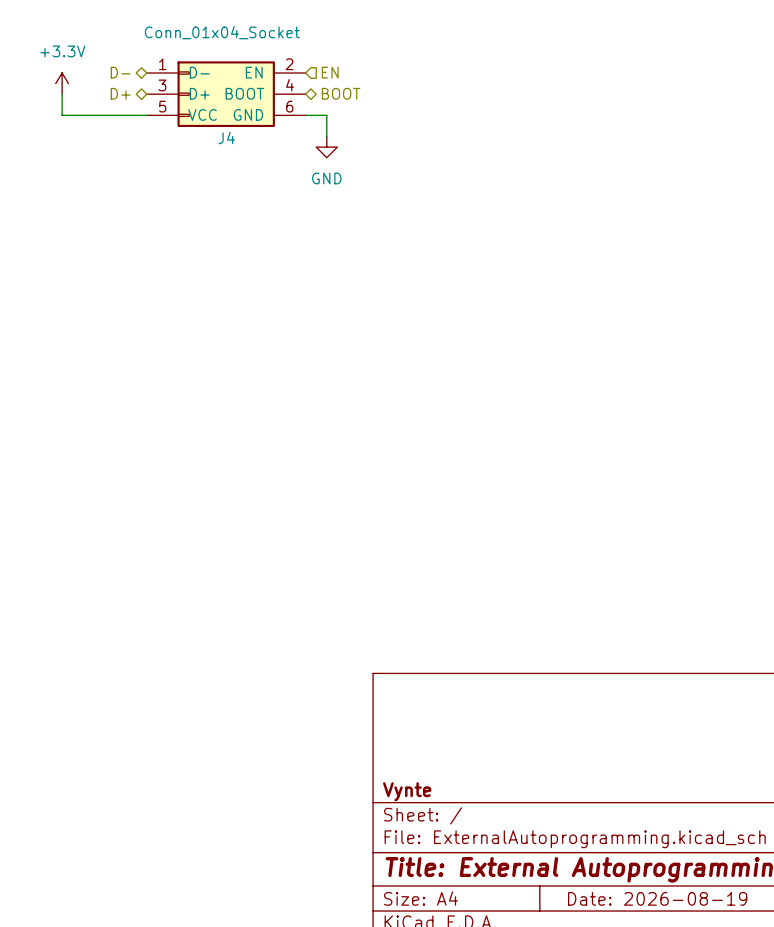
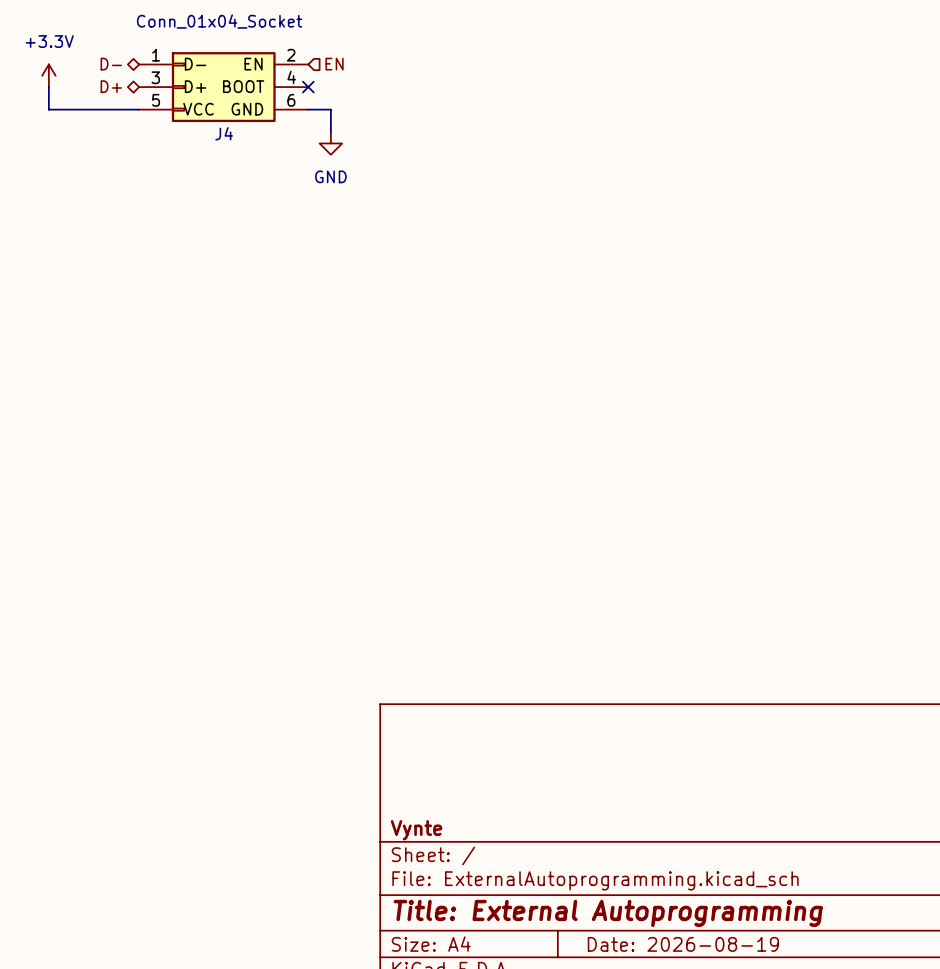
hierarchical label: BOOT (341, 93) -> none
no-connect mark: none -> (308, 87)

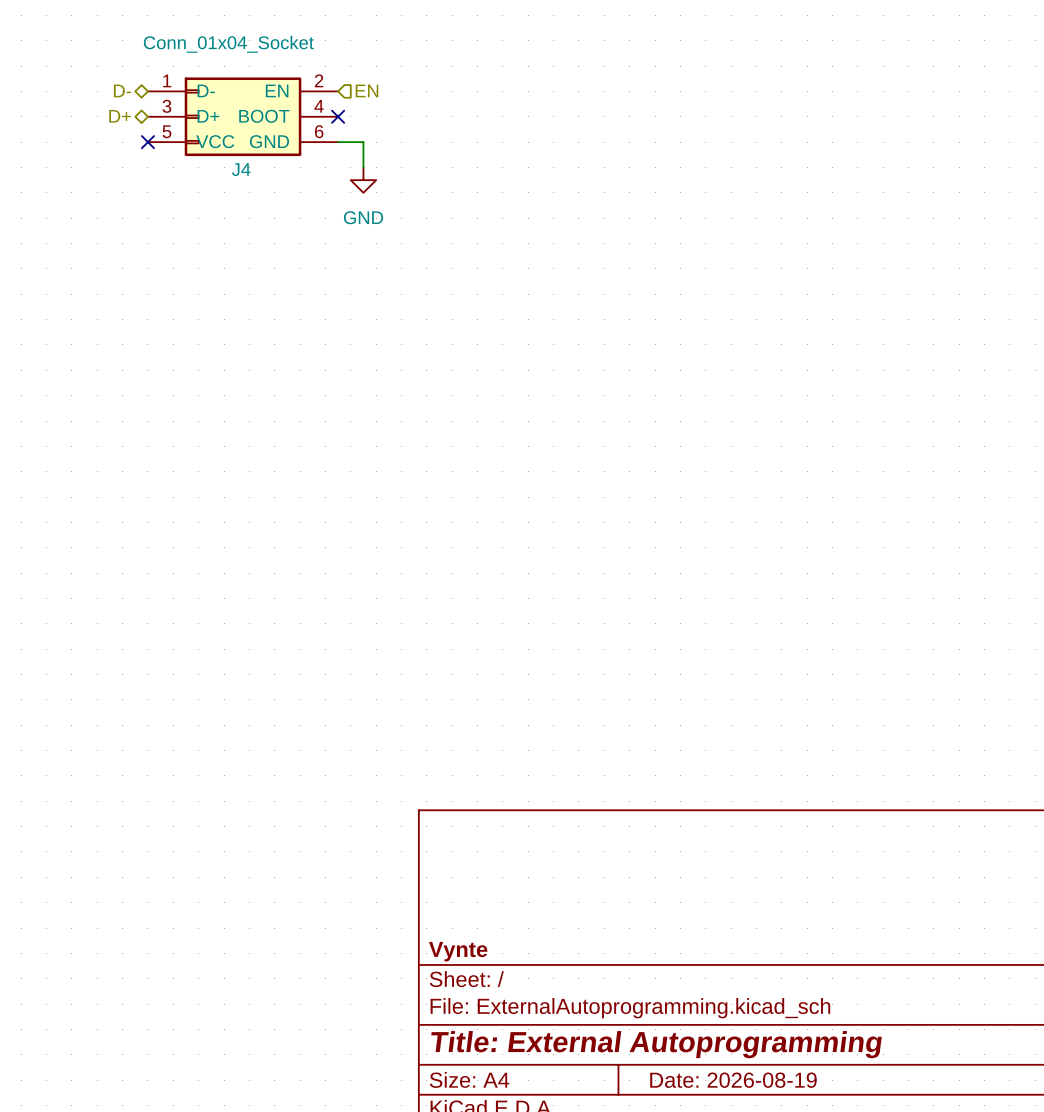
power symbol: +3.3V (48, 75) -> none
wire: (48, 87) (48, 109) (139, 109) -> none
no-connect mark: none -> (147, 142)

